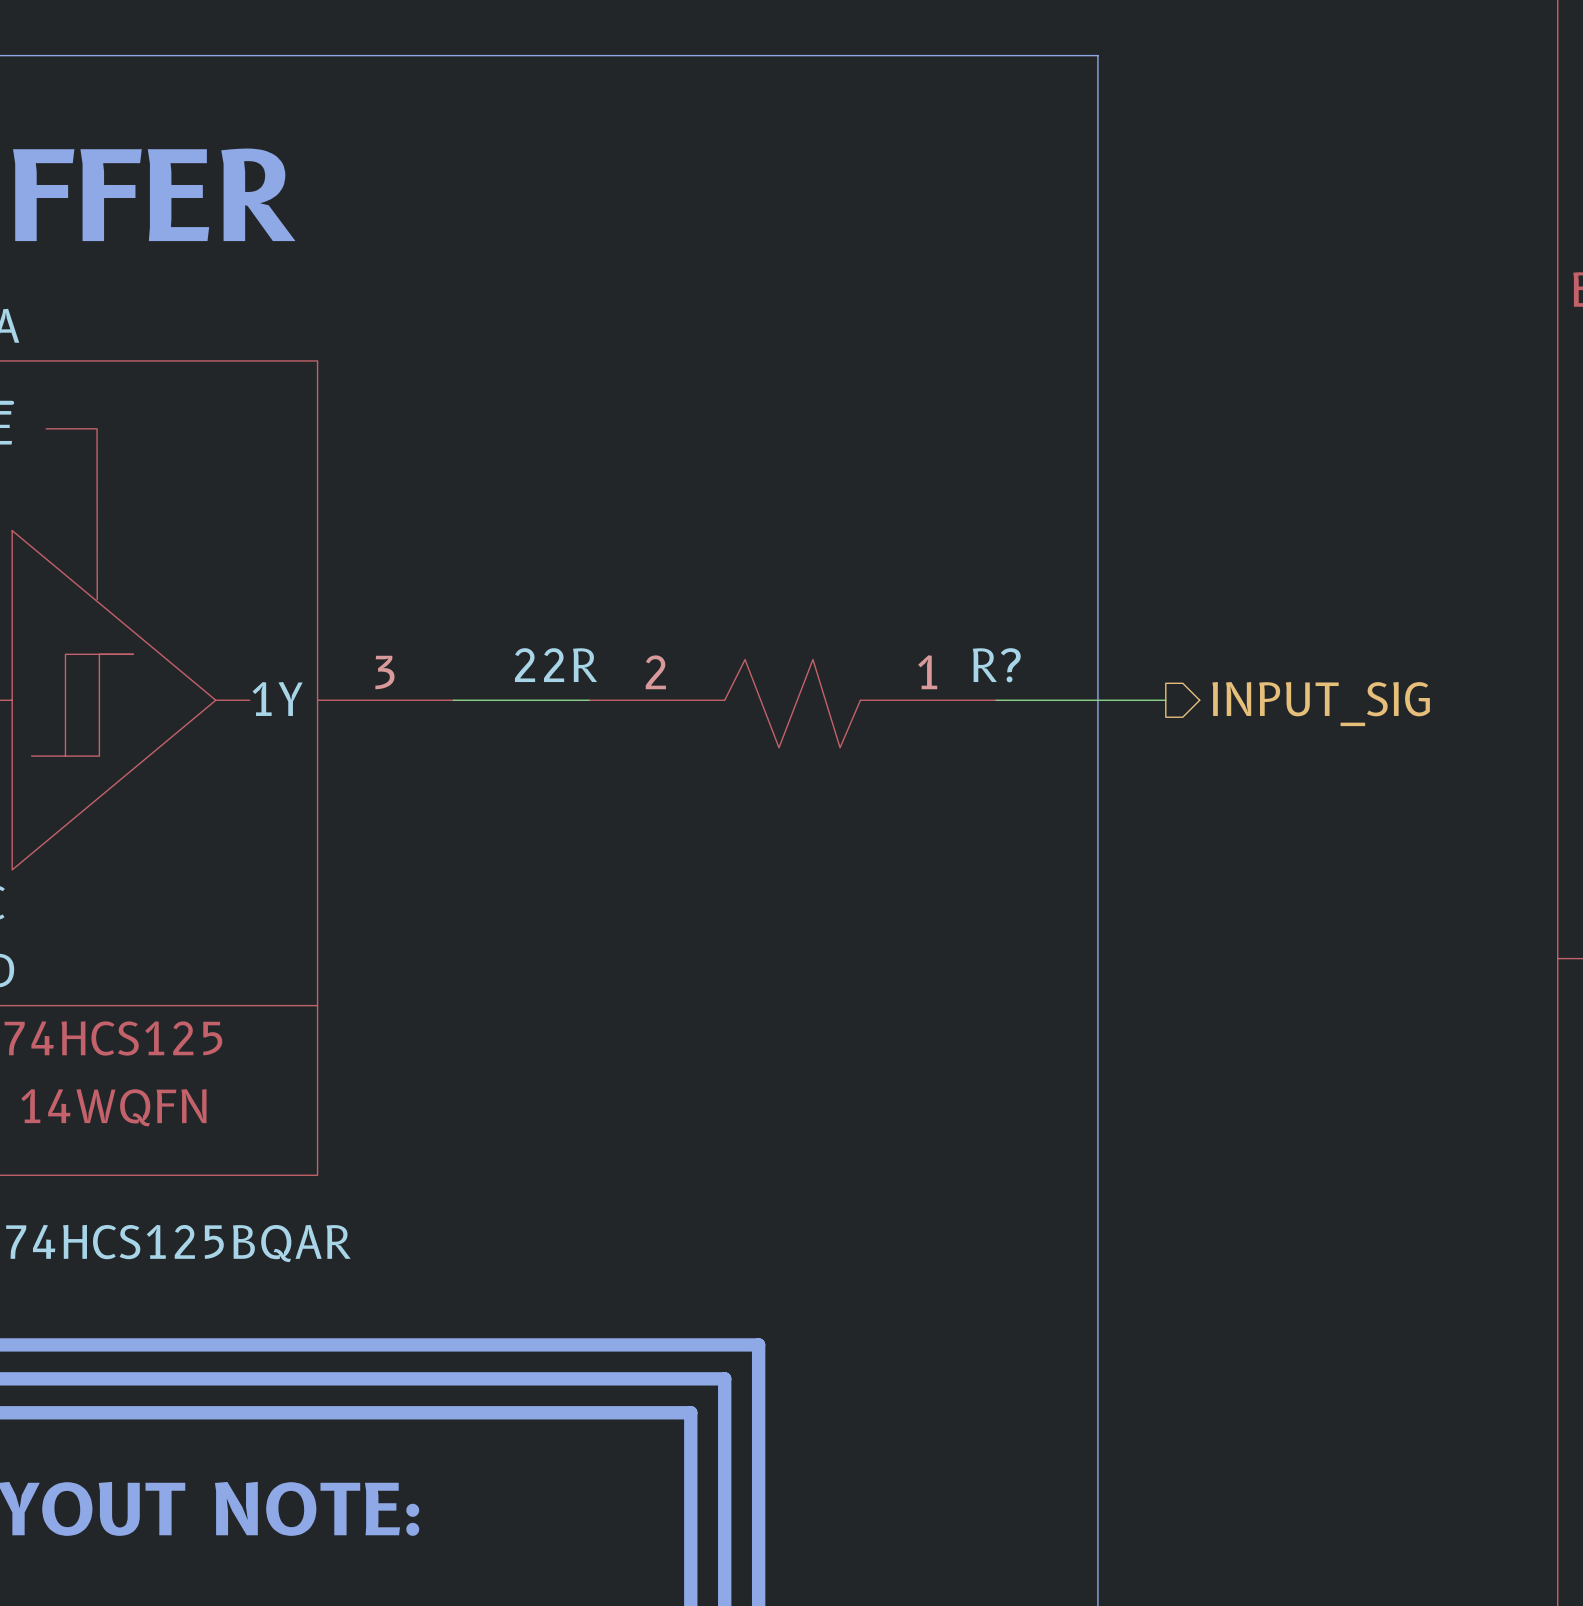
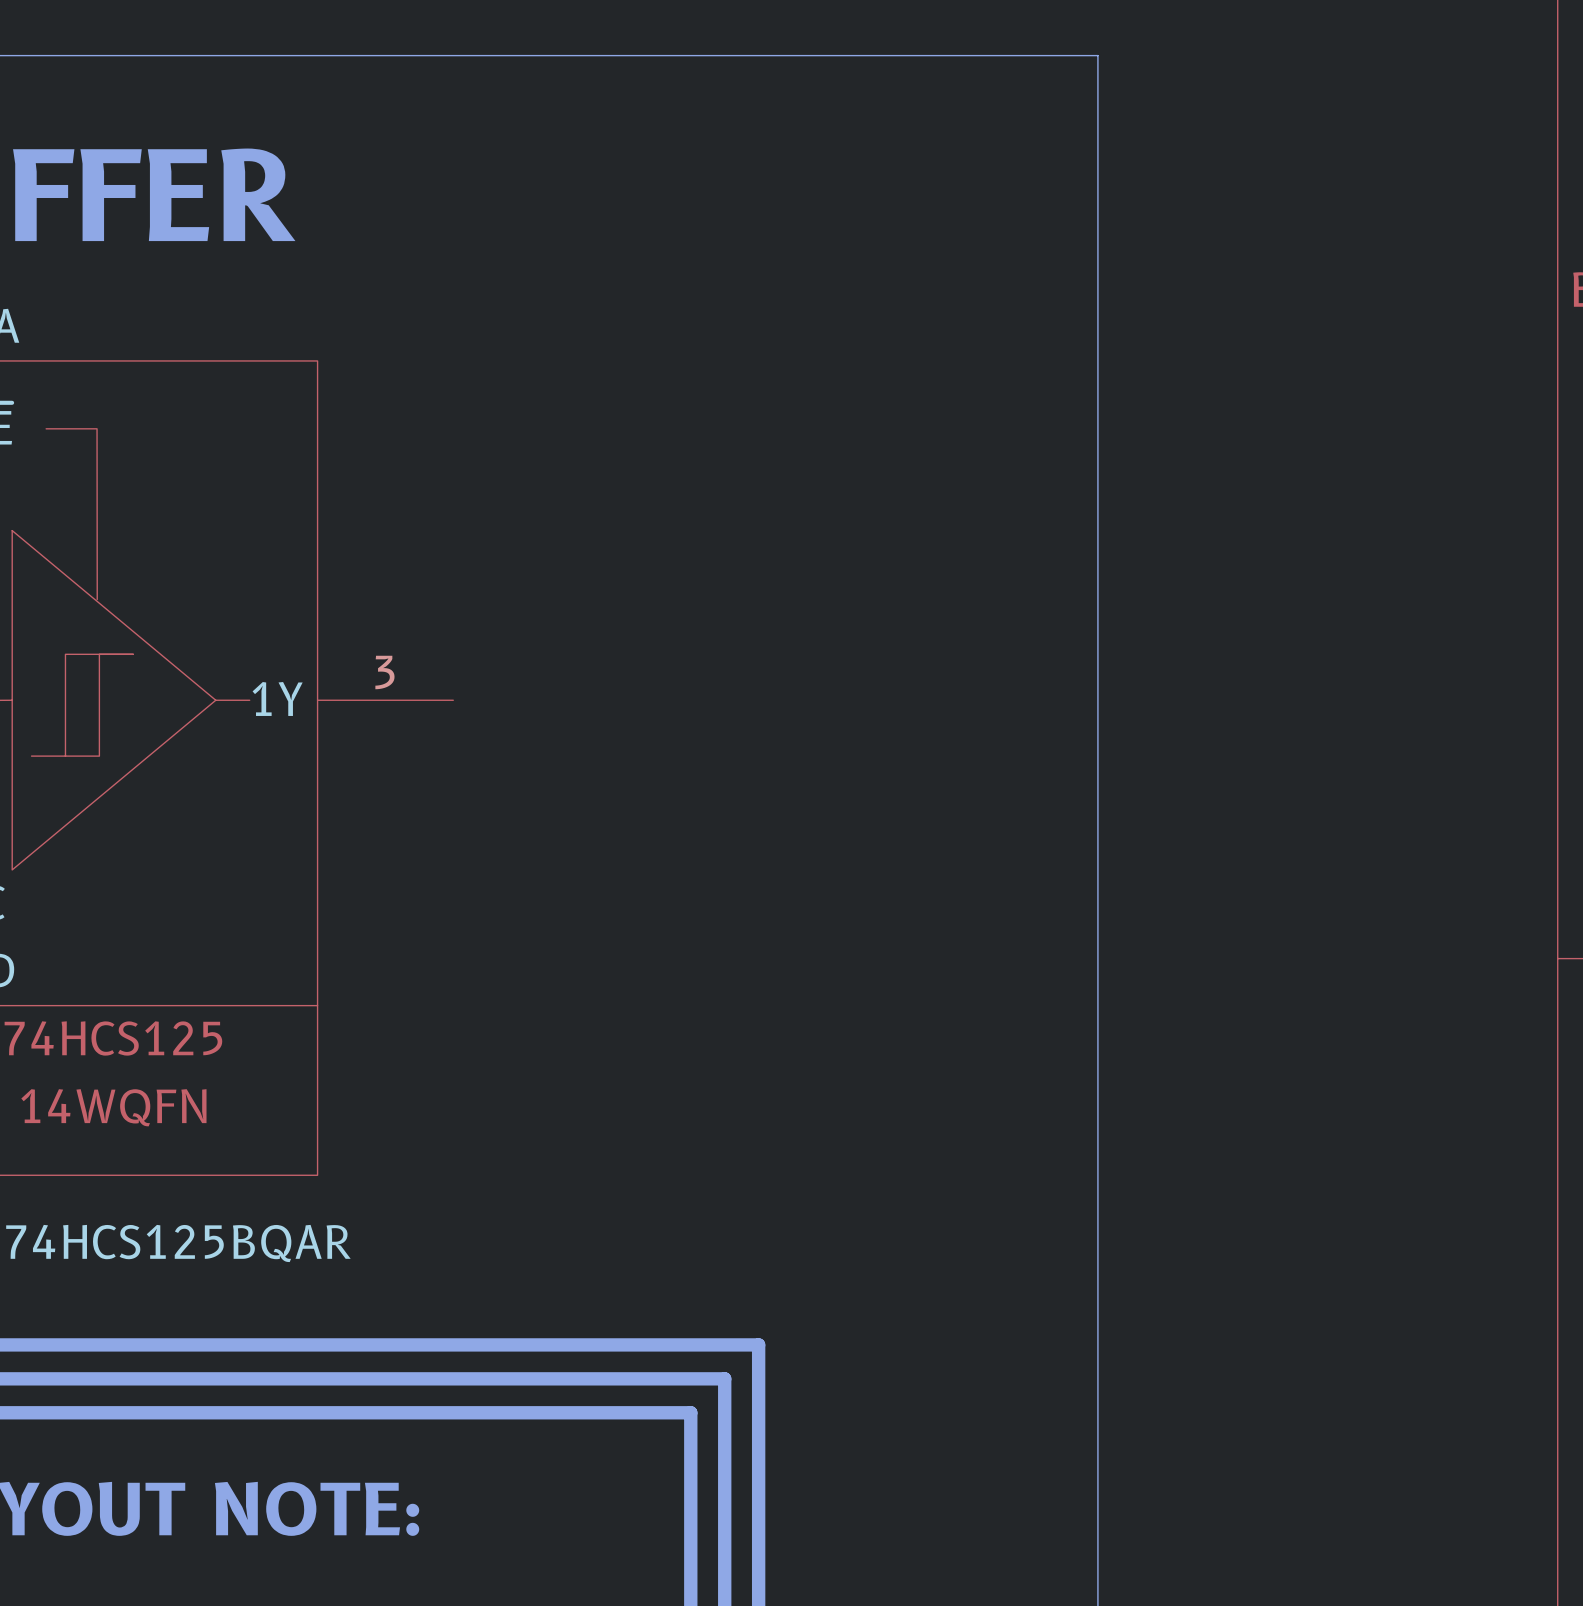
wire: (453, 700) (589, 700) -> none
wire: (996, 700) (1165, 700) -> none
R?: 22R (792, 703) -> none
hierarchical label: INPUT_SIG (1321, 704) -> none

